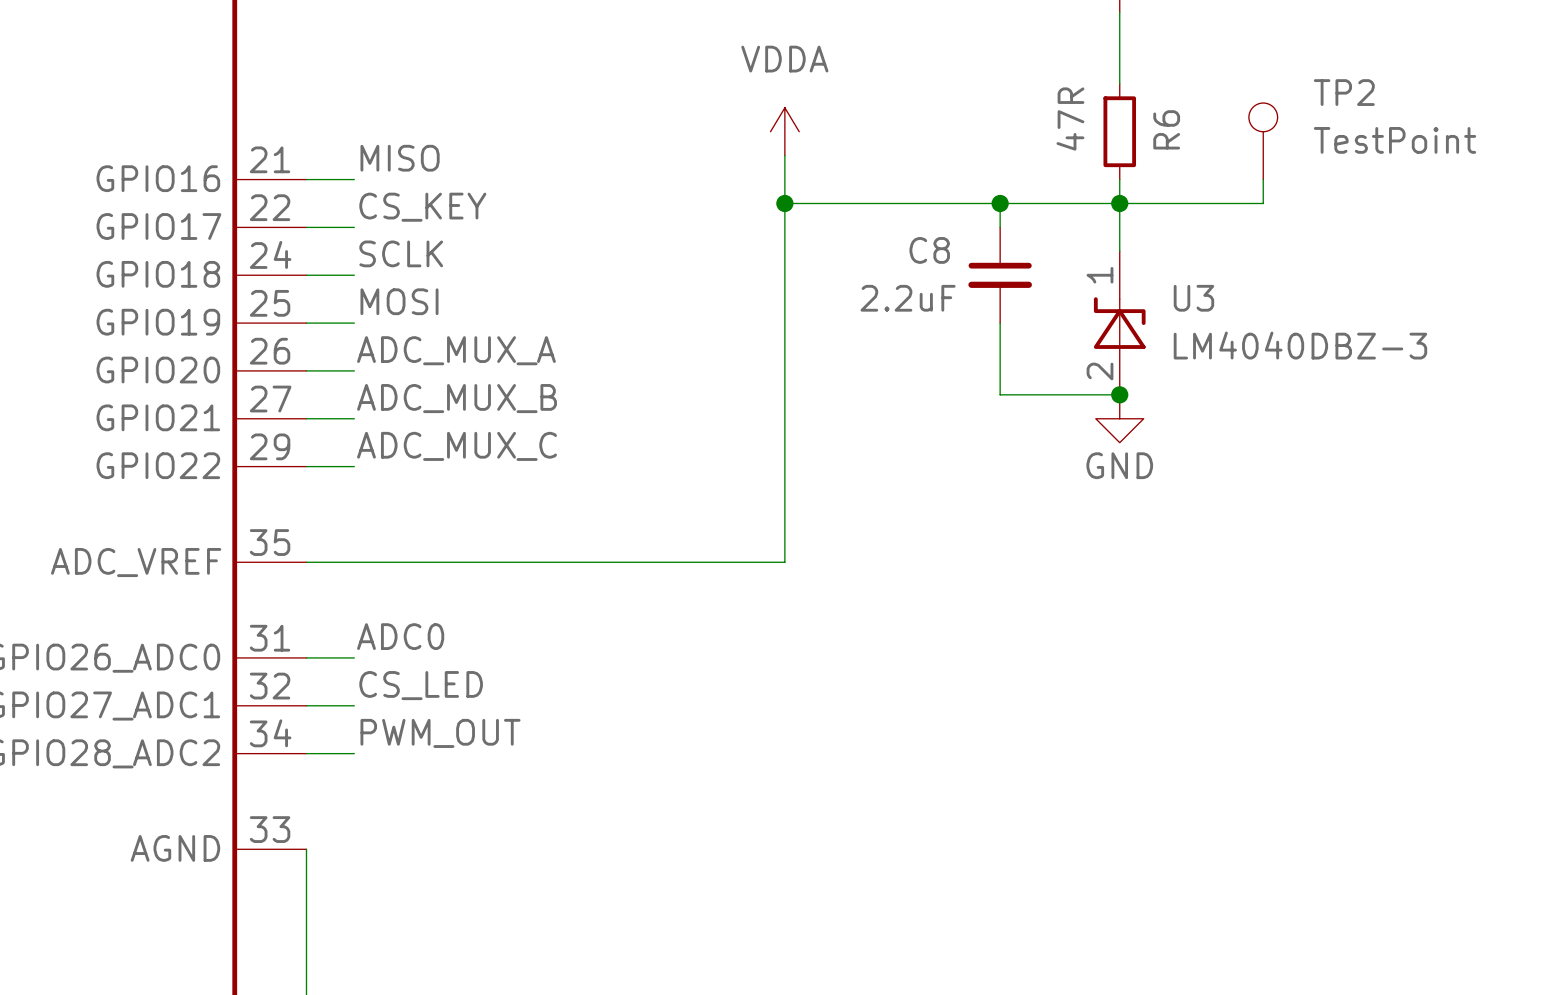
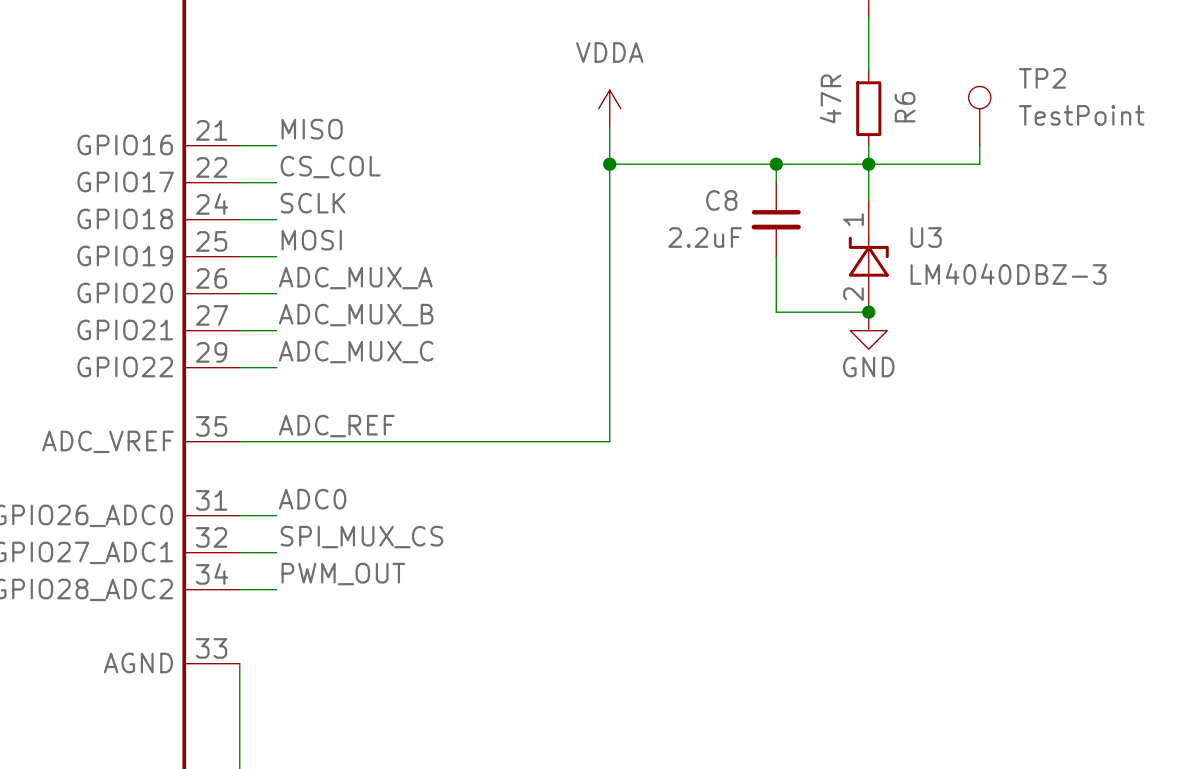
label: CS_KEY (422, 207) -> CS_COL (330, 167)
label: none -> ADC_REF (336, 426)
label: CS_LED (421, 685) -> SPI_MUX_CS (361, 537)

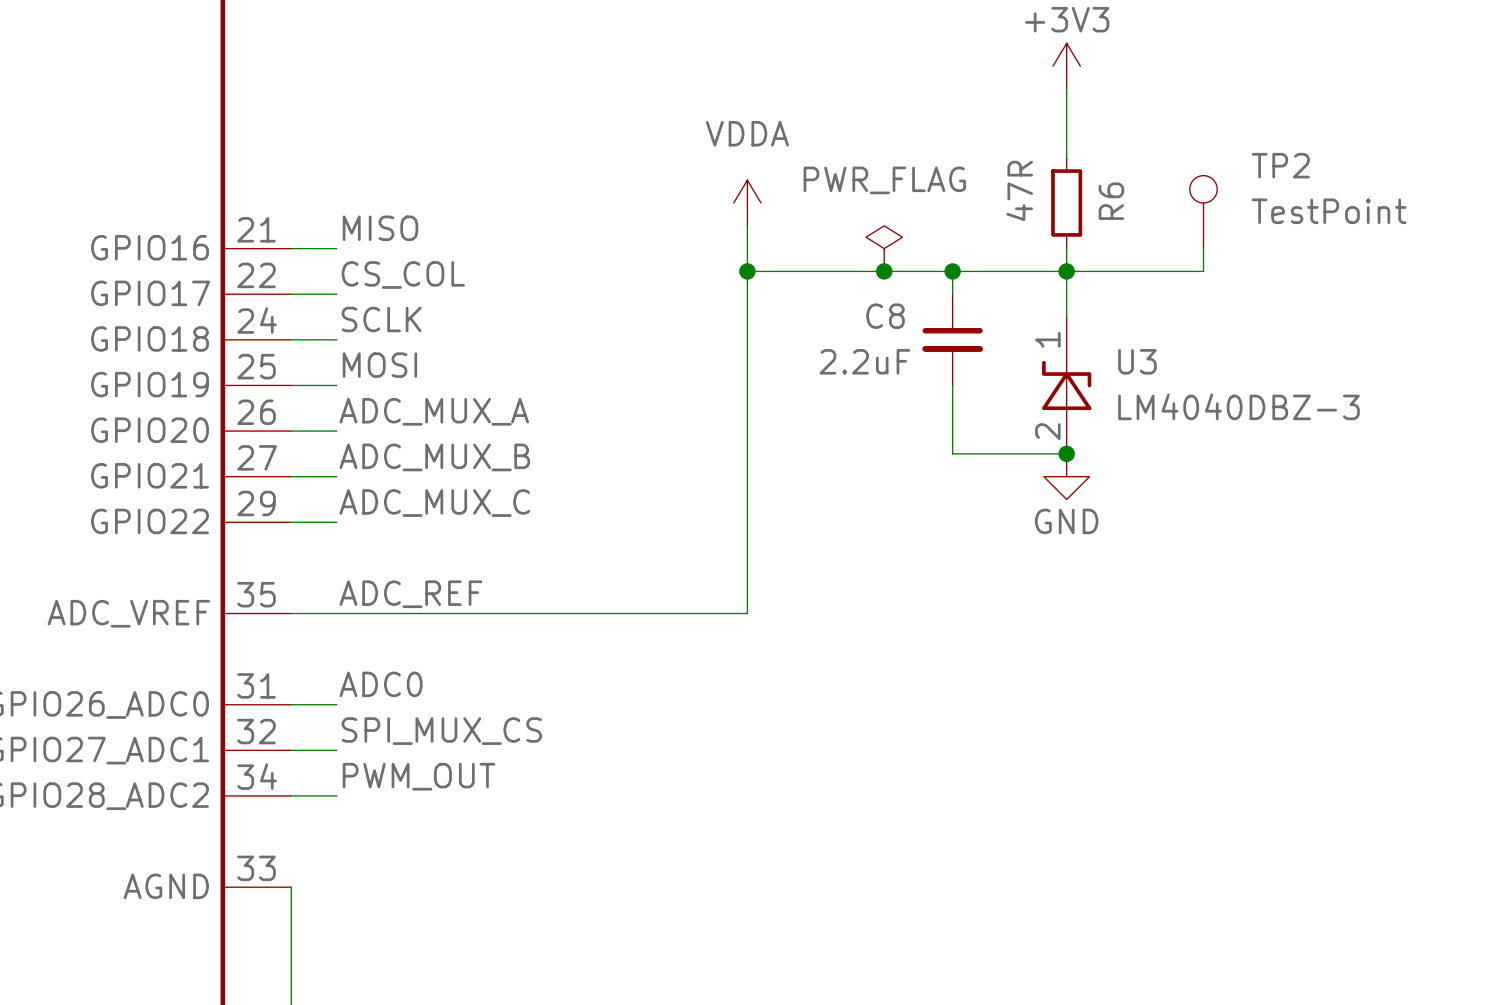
power symbol: none -> PWR_FLAG (884, 248)
junction: none -> (884, 271)

